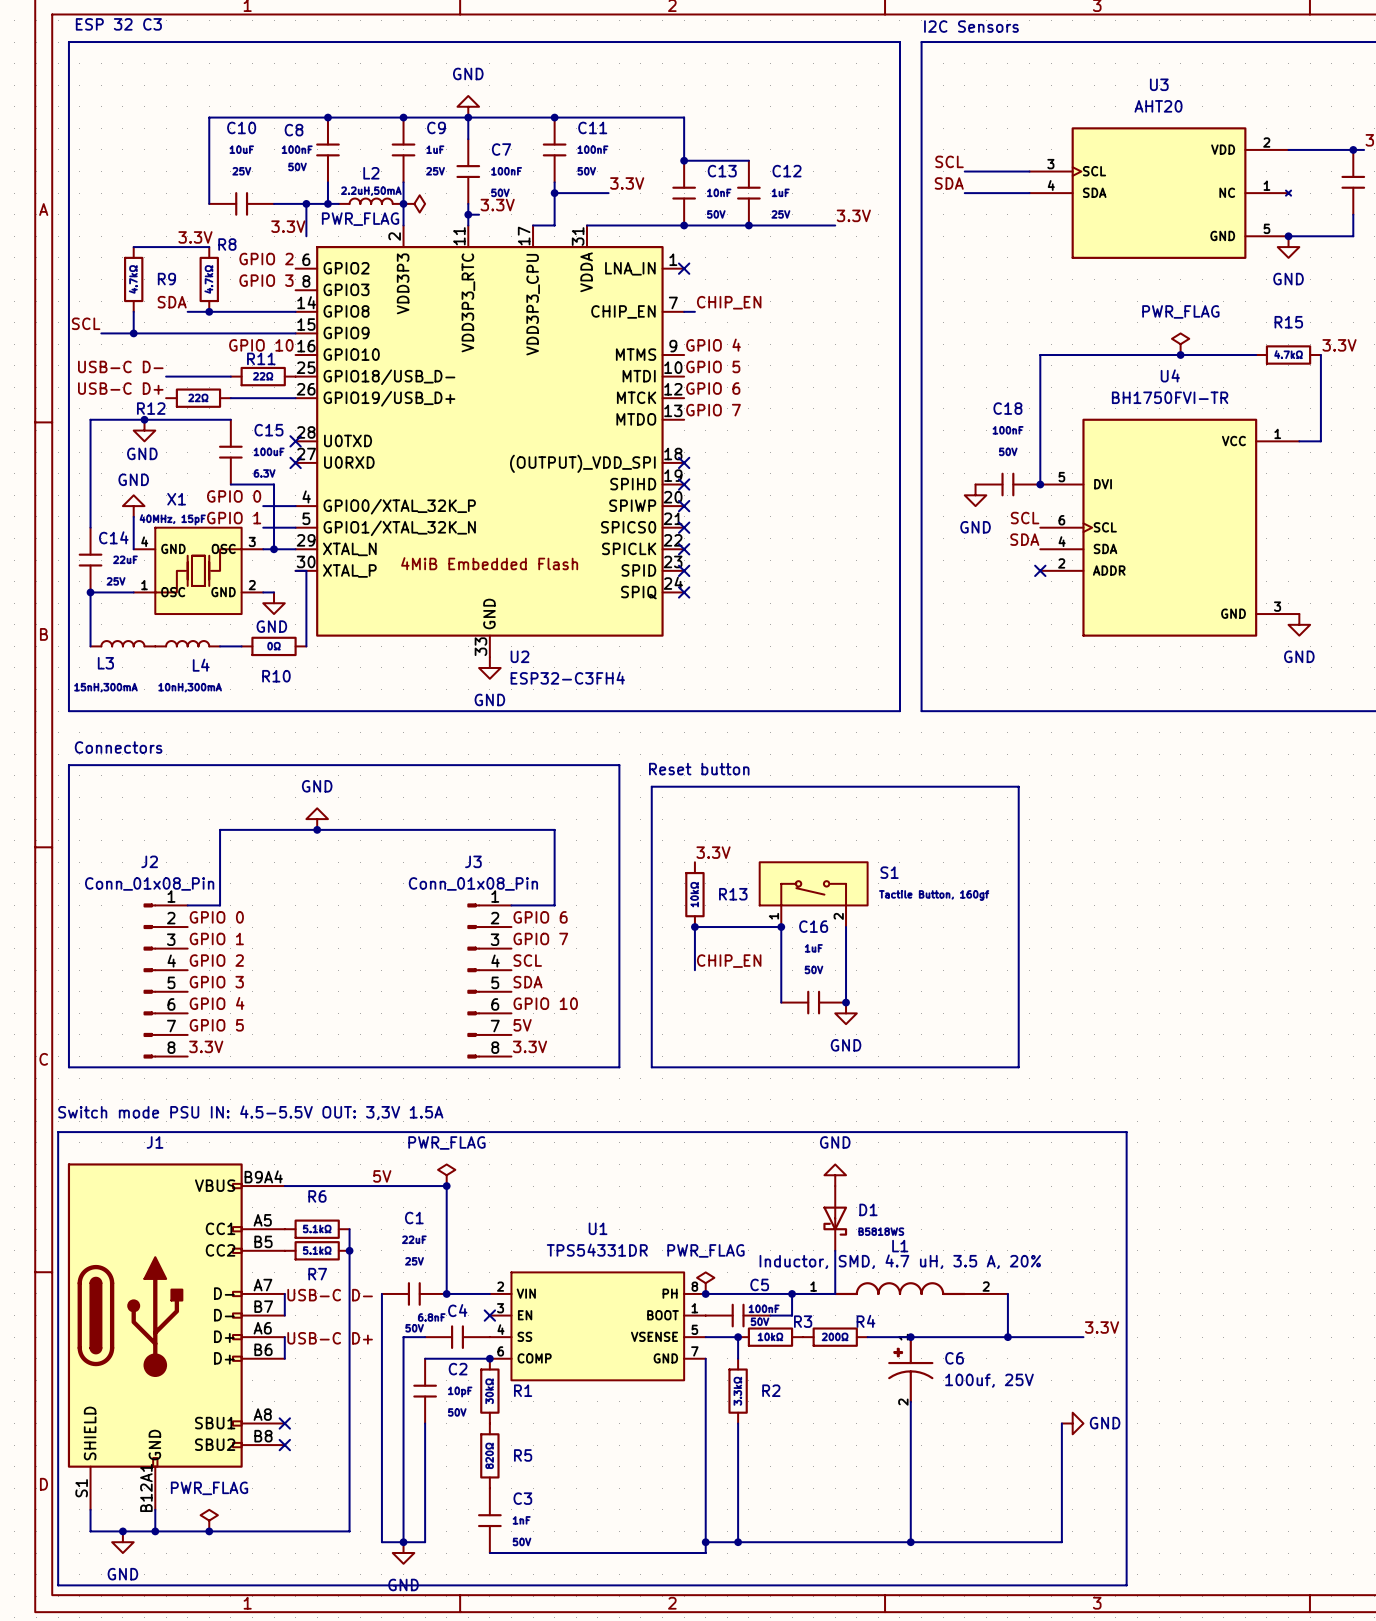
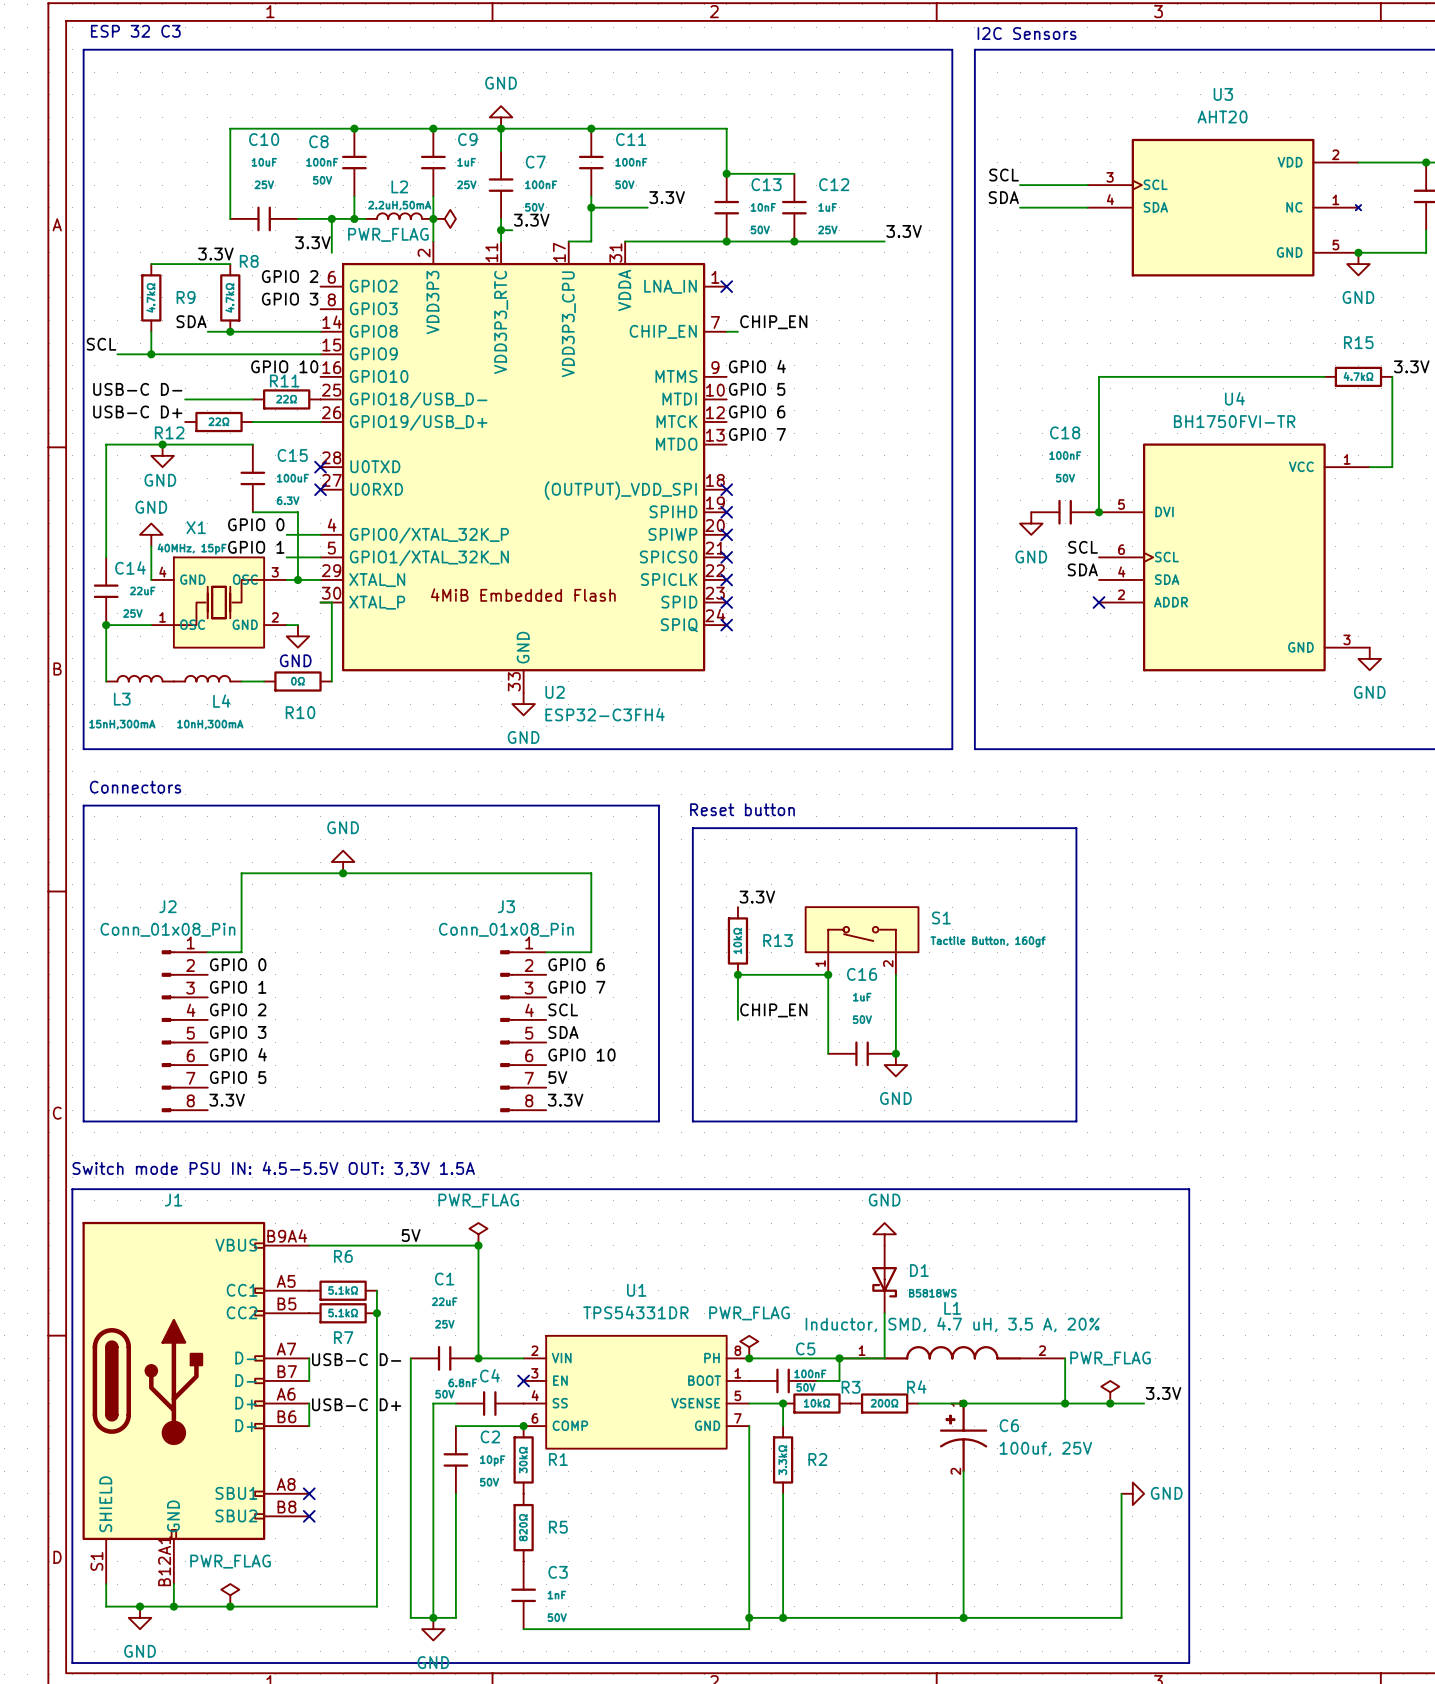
power symbol: PWR_FLAG (1180, 344) -> none
junction: (1180, 355) -> none
power symbol: none -> PWR_FLAG (1110, 1392)
junction: none -> (1110, 1403)

